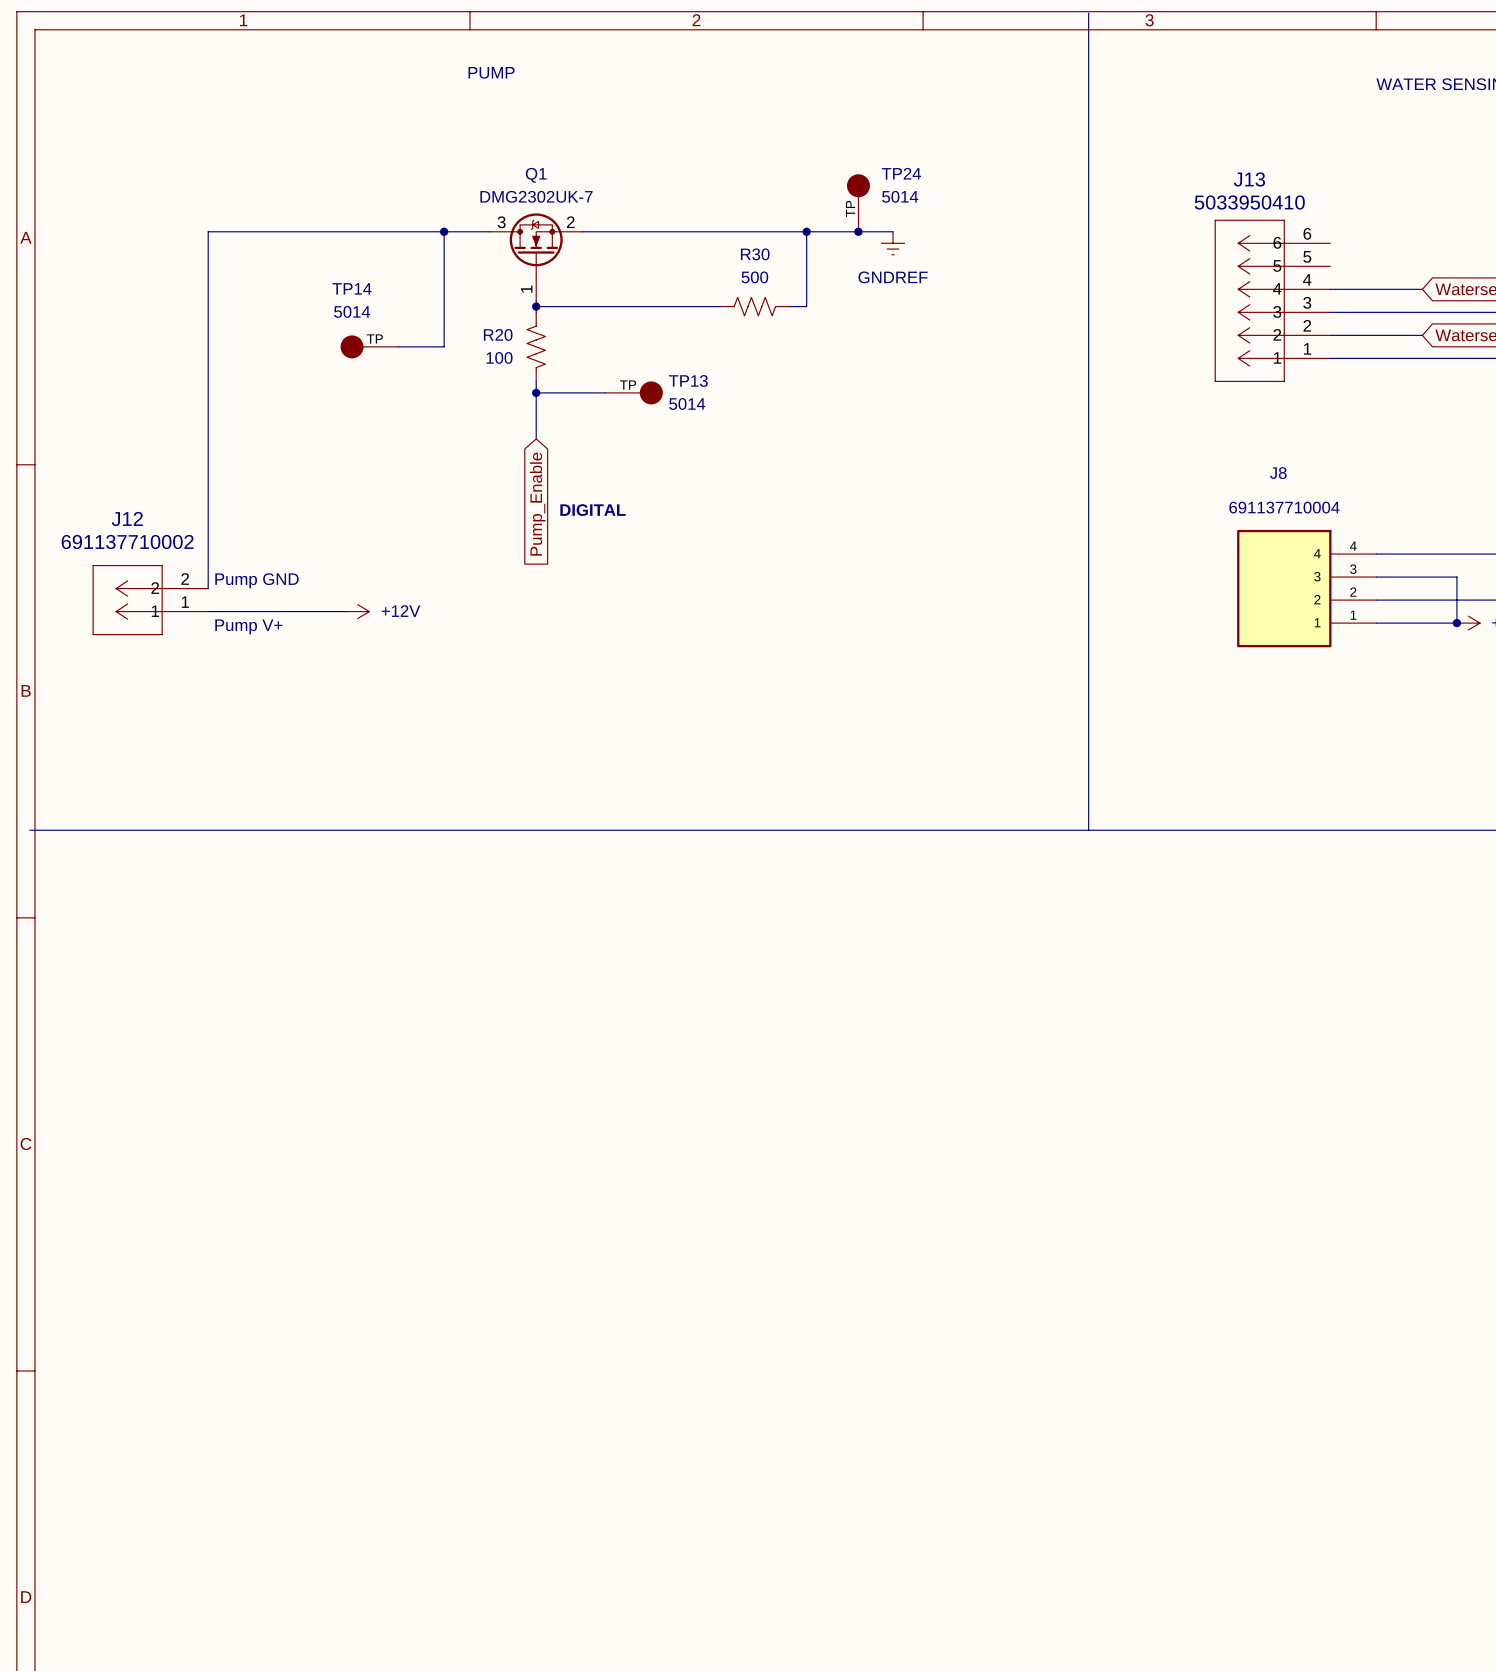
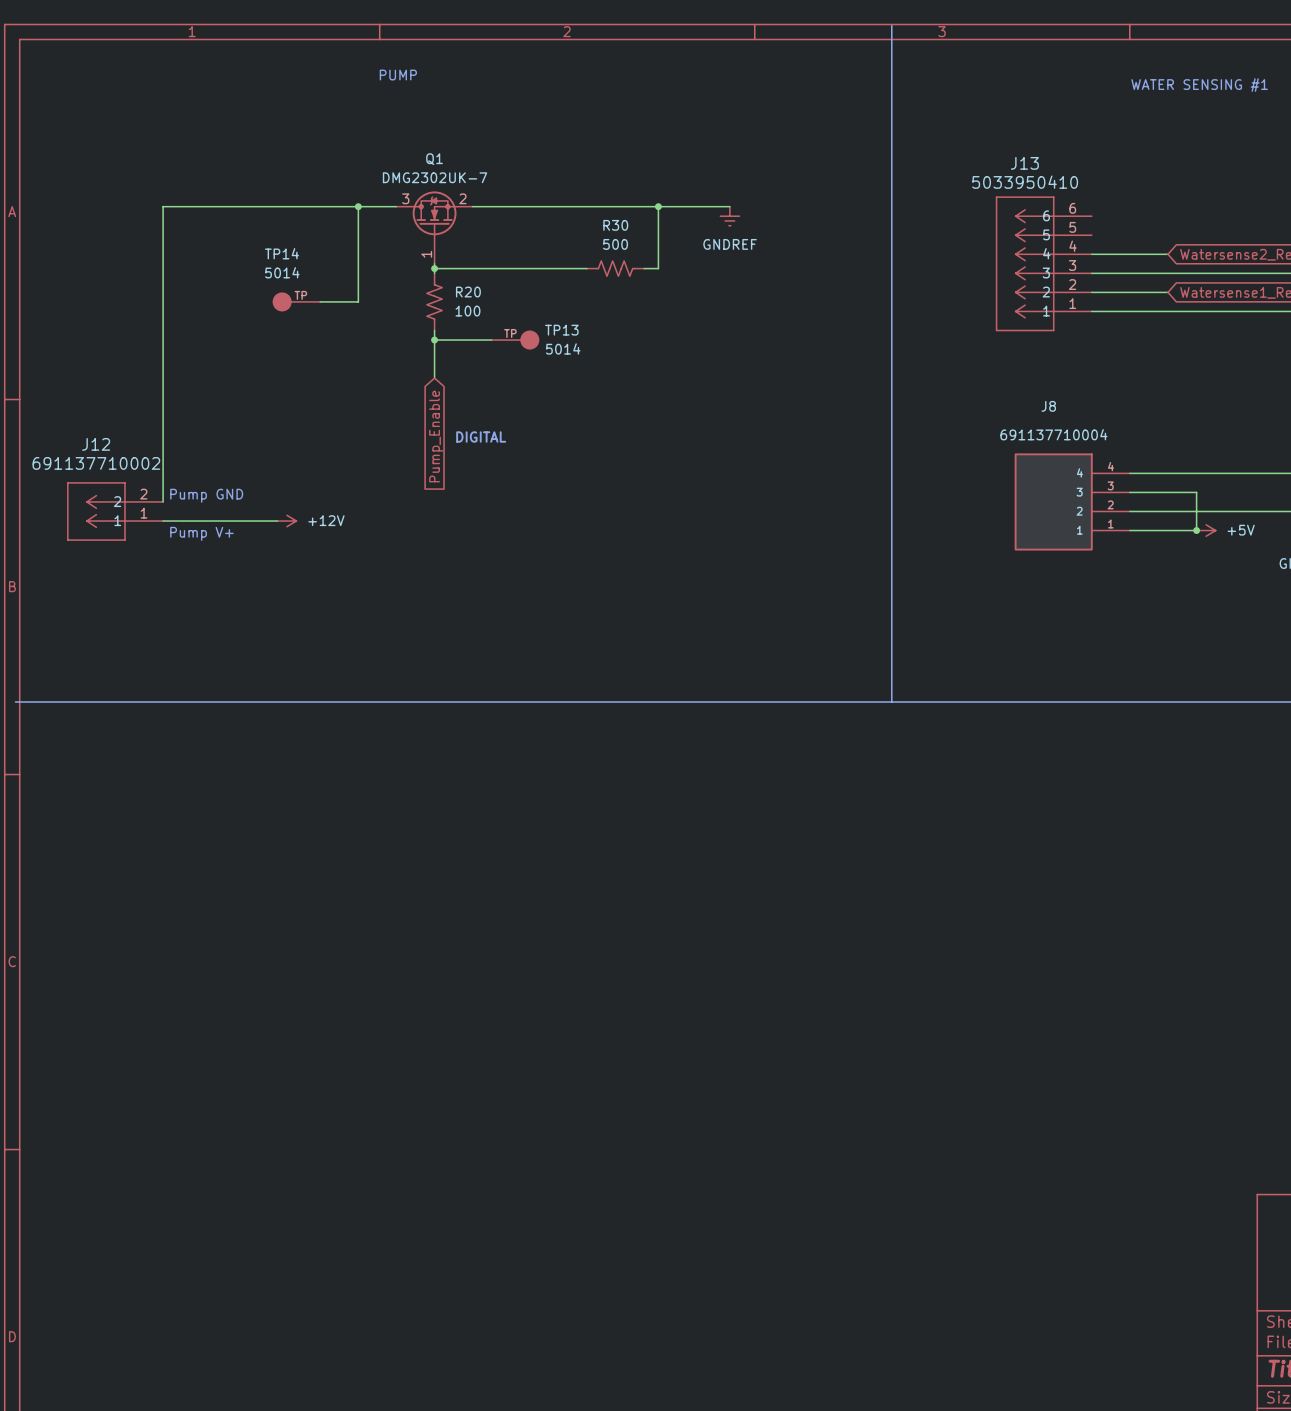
TP24: 5014 (858, 203) -> none
junction: (858, 231) -> none
R20 flip: as is (536, 346) -> left-right (434, 301)

